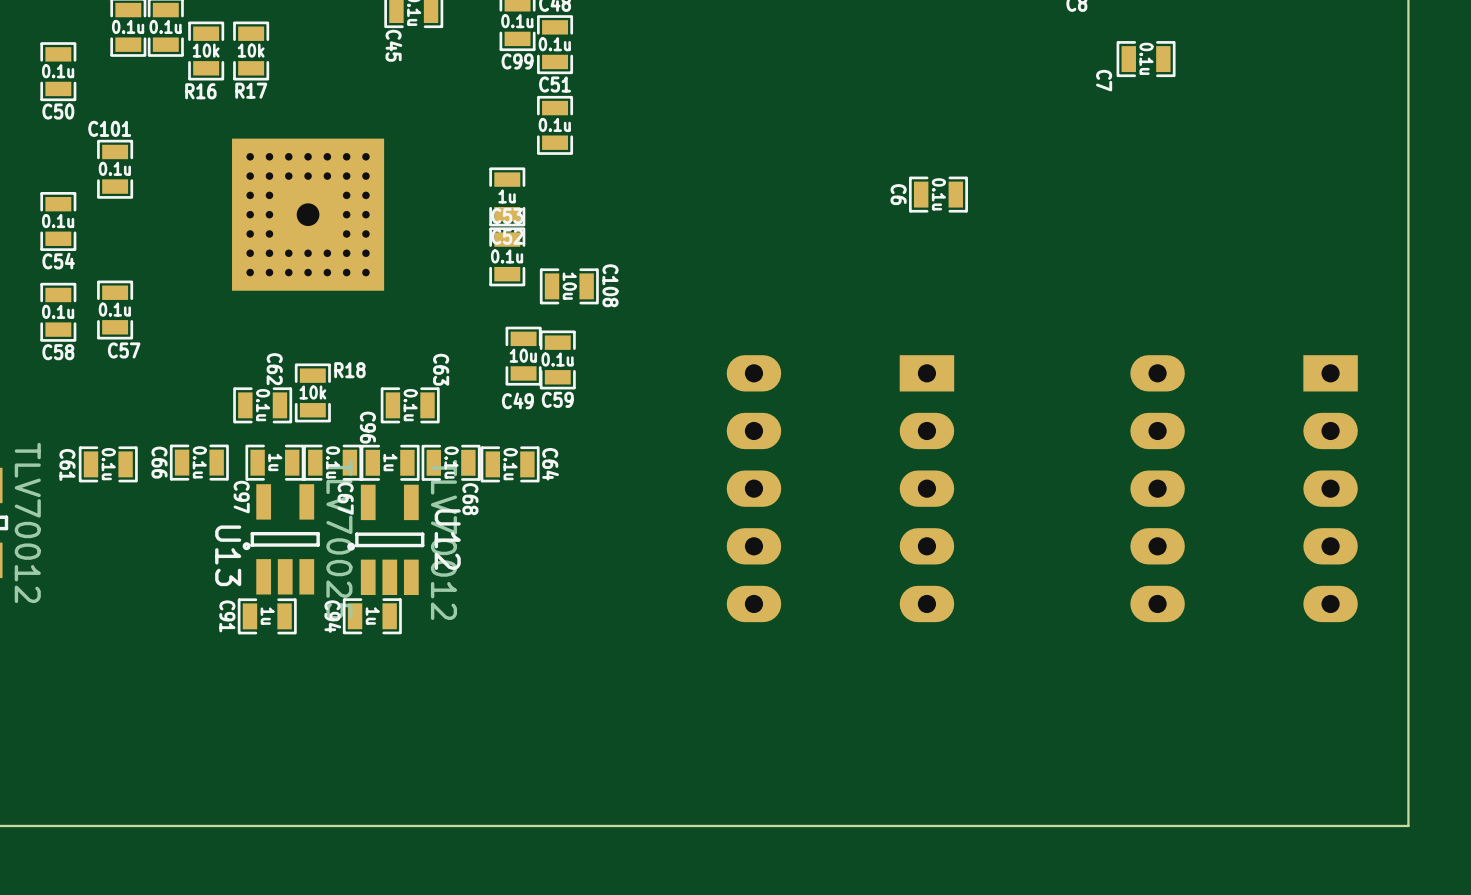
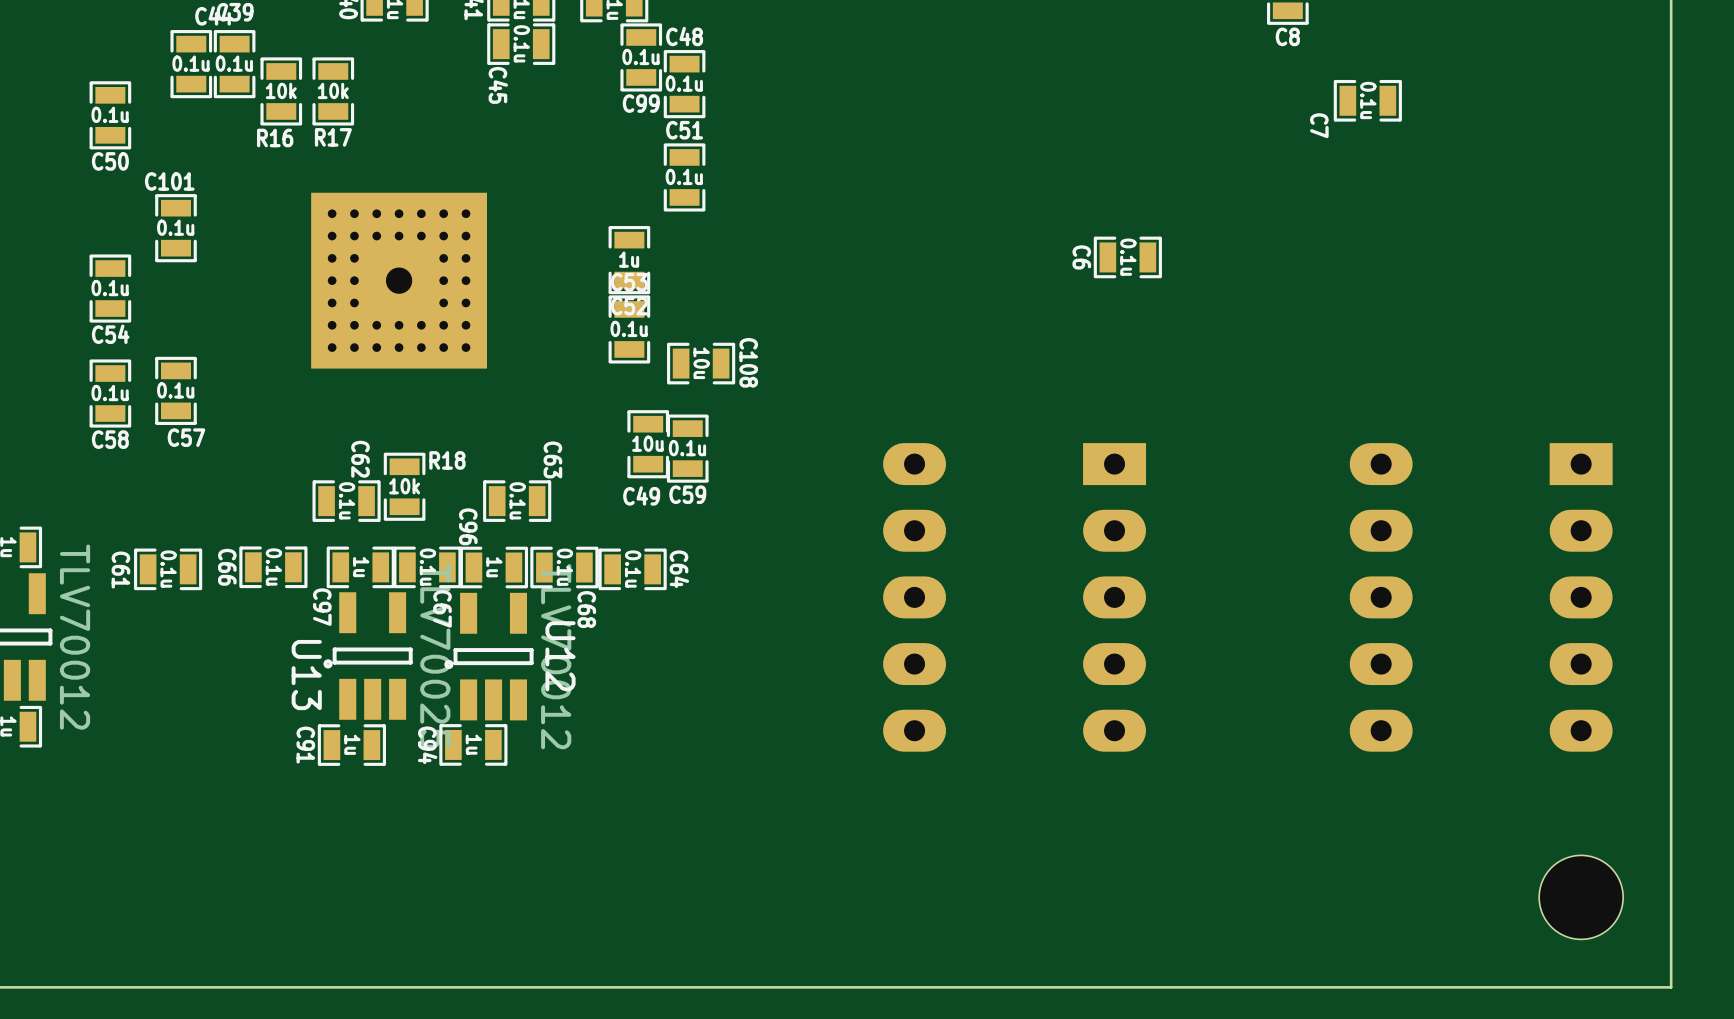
part: none -> (1581, 897)

